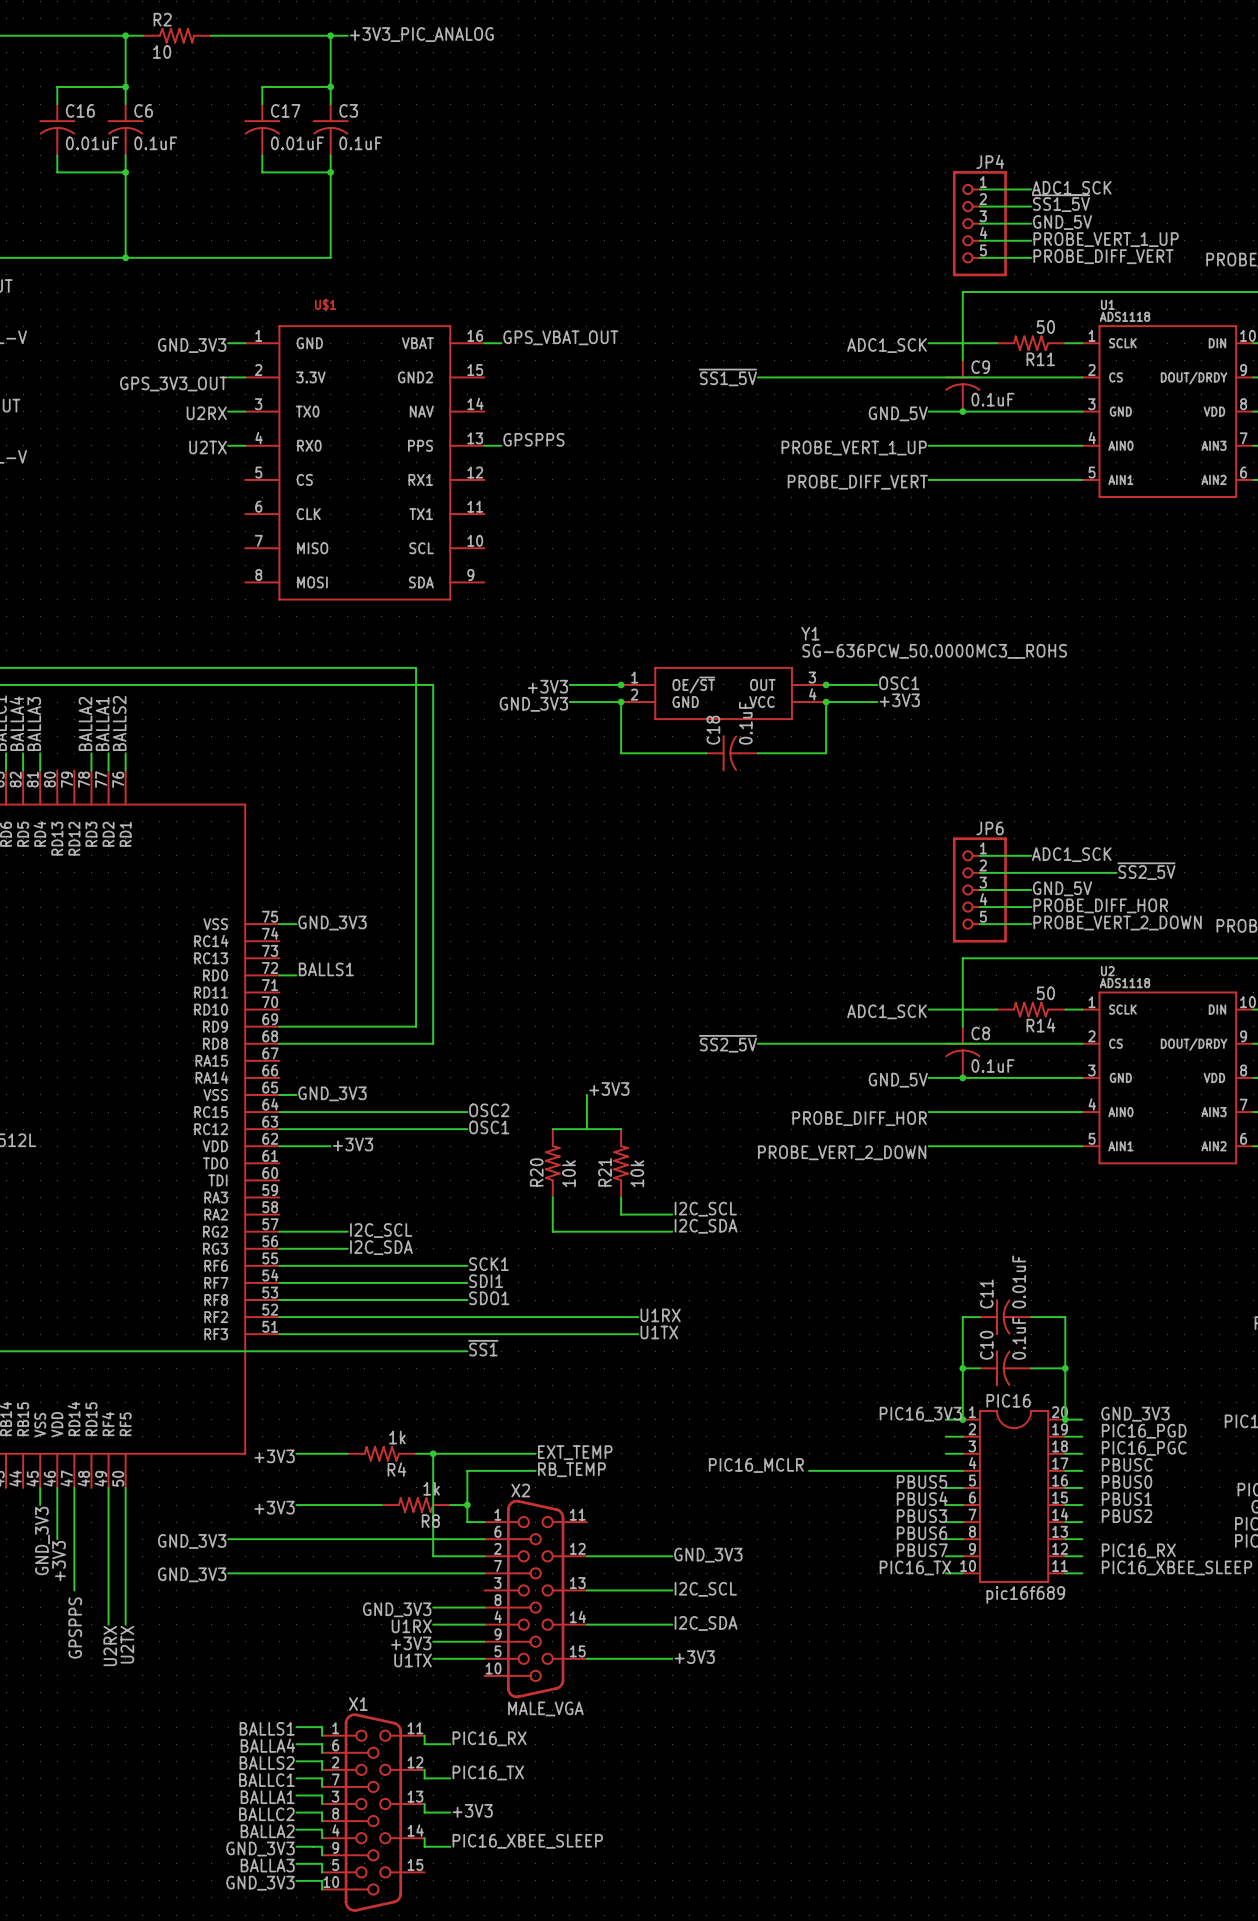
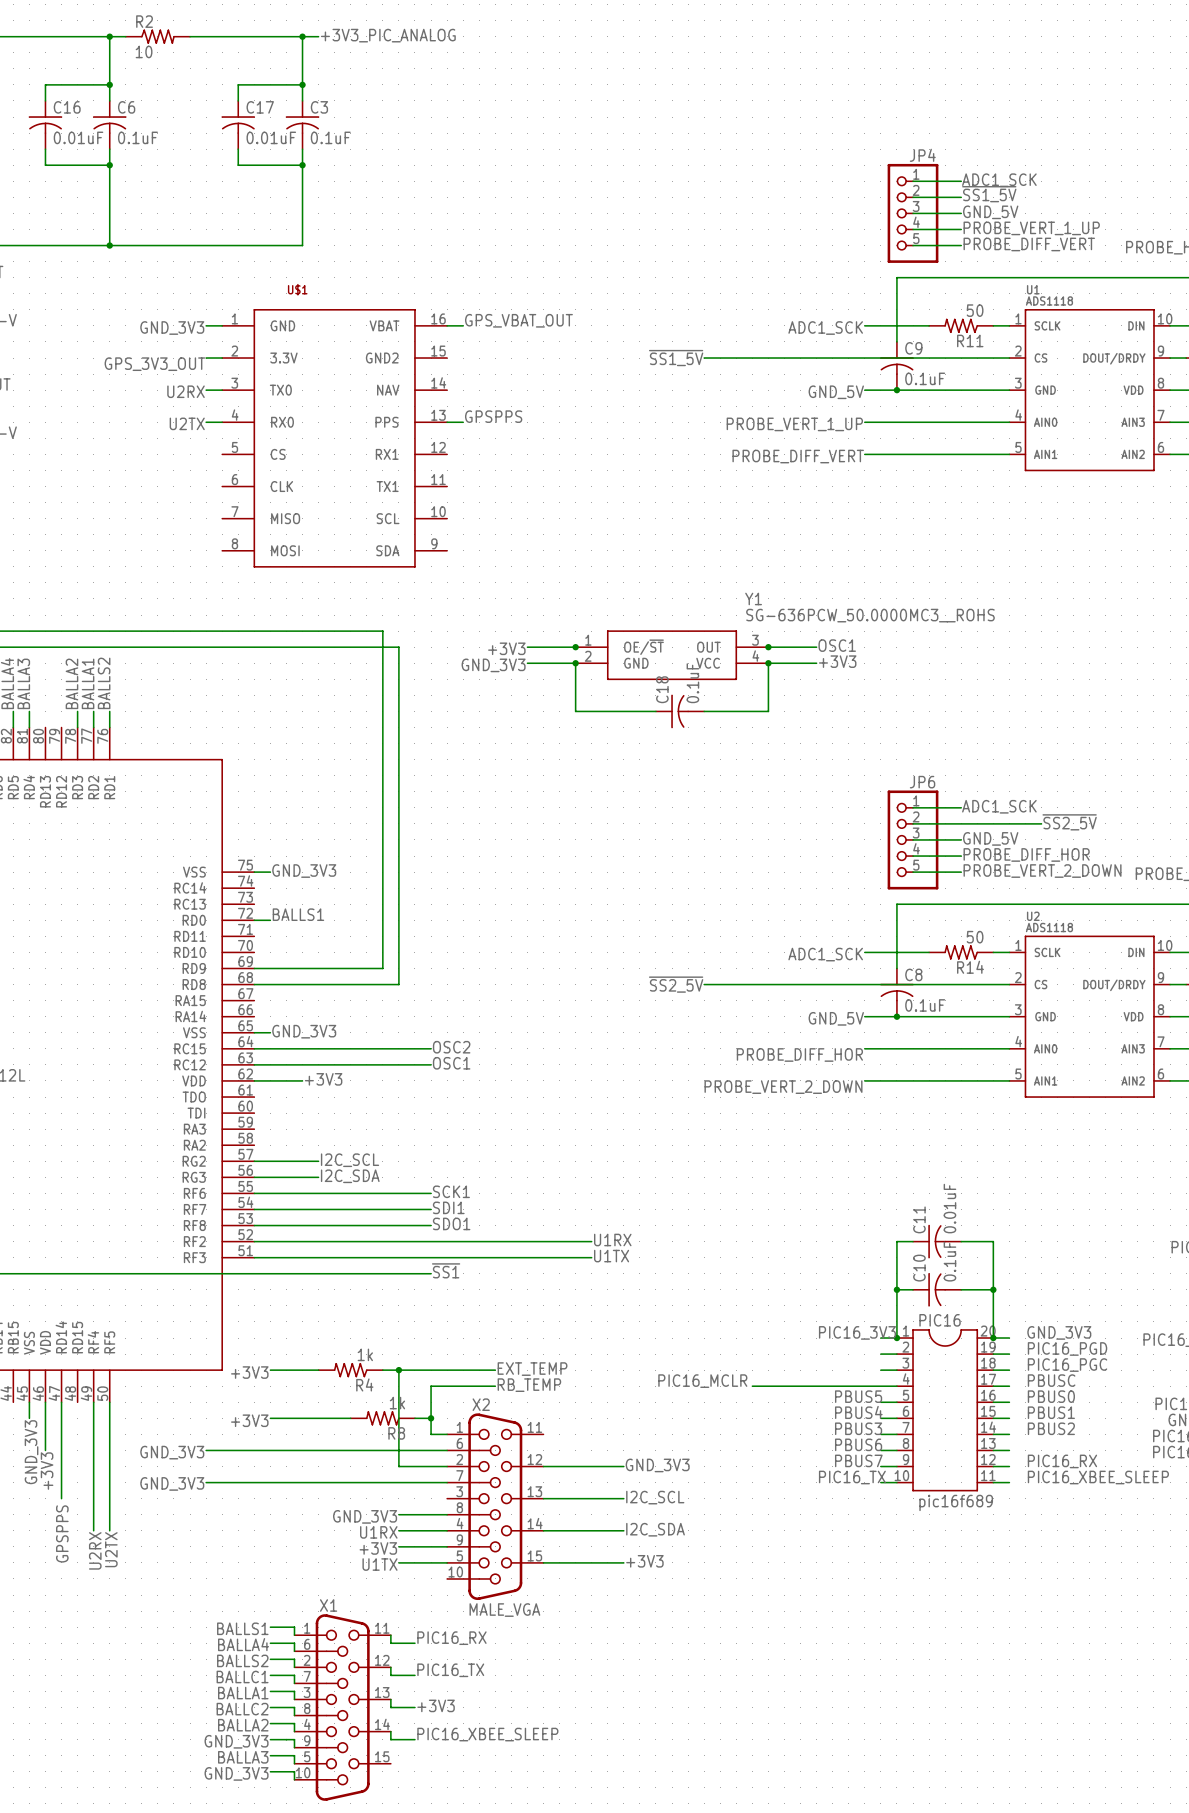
label: +3V3 (609, 1089) -> none
wire: (586, 1094) (586, 1129) -> none
wire: (552, 1129) (621, 1129) -> none
R20: 10k (552, 1163) -> none
R21: 10k (621, 1163) -> none
wire: (552, 1197) (552, 1231) (672, 1231) -> none
wire: (621, 1197) (621, 1214) (672, 1214) -> none
label: I2C_SCL (705, 1209) -> none
label: I2C_SDA (706, 1226) -> none

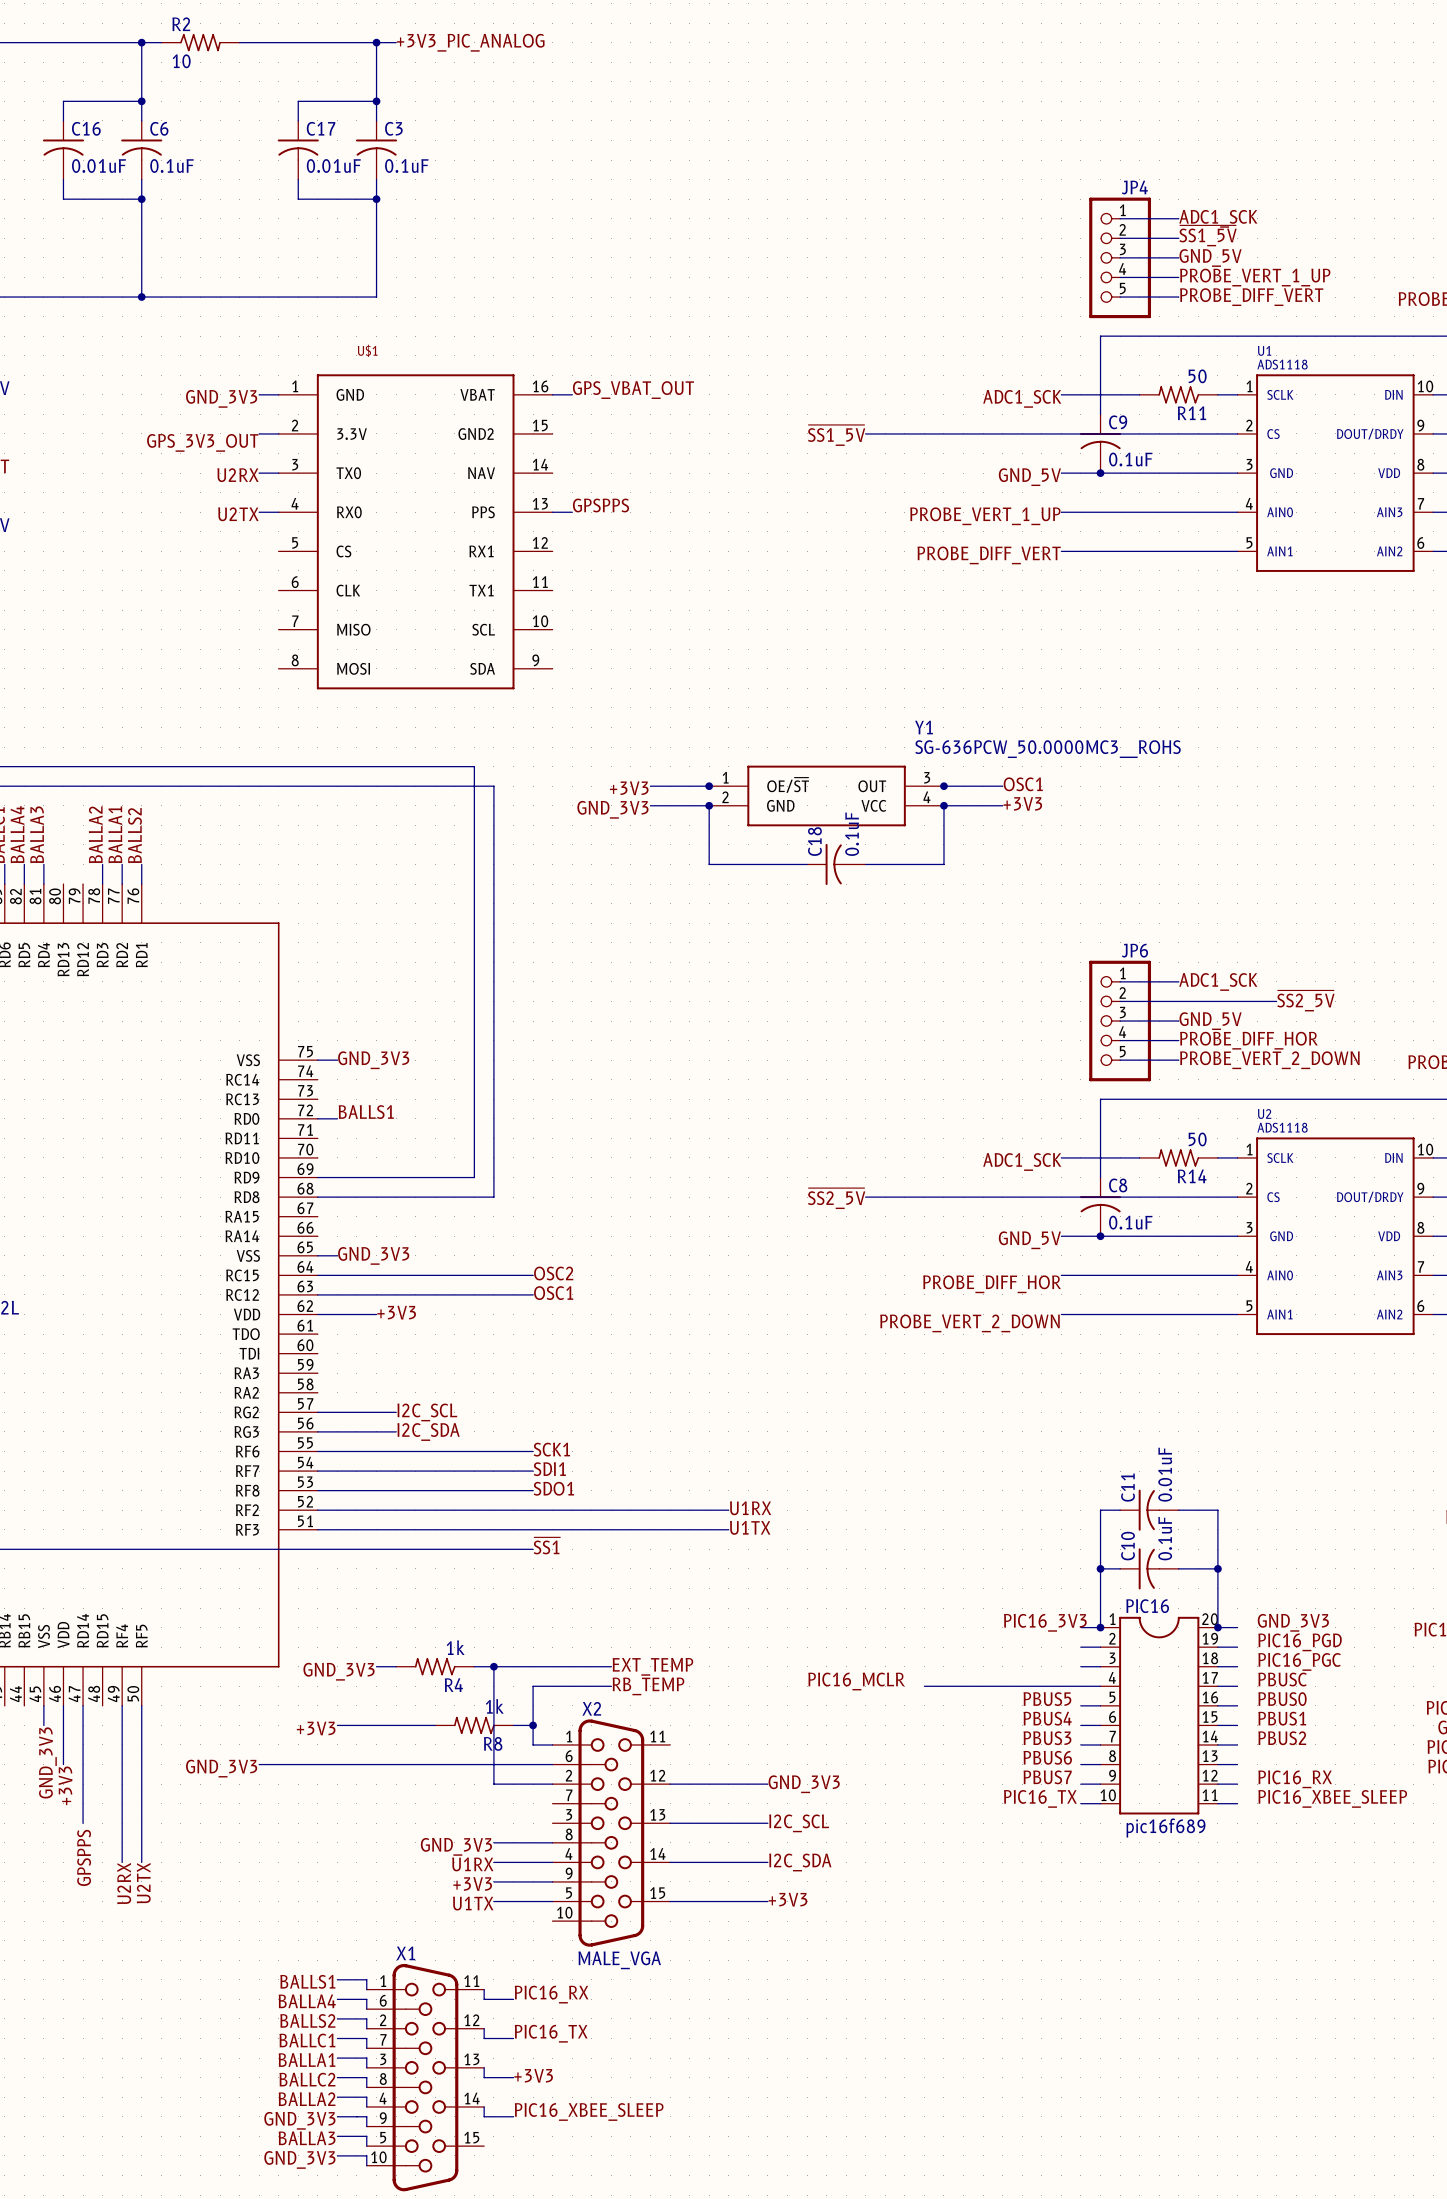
wire: (270, 1370) (302, 1370) -> none
label: +3V3 (249, 1372) -> none
wire: (206, 1482) (447, 1482) -> none
label position: GND_3V3 (172, 1483) -> GND_3V3 (339, 1671)

